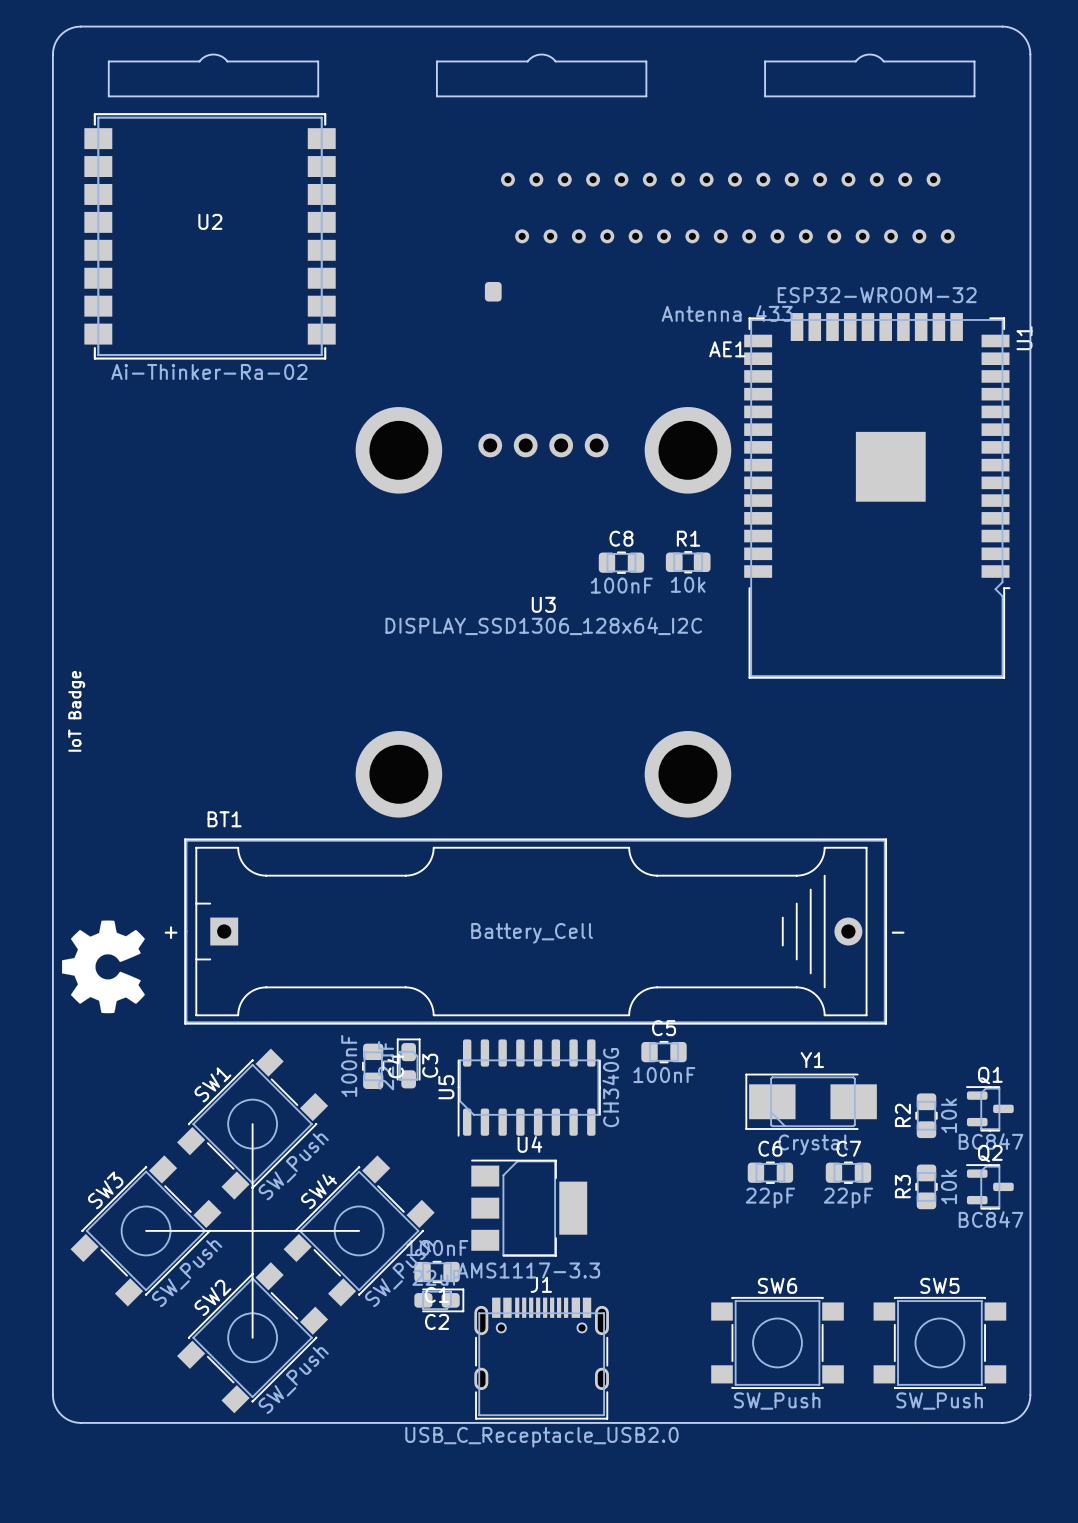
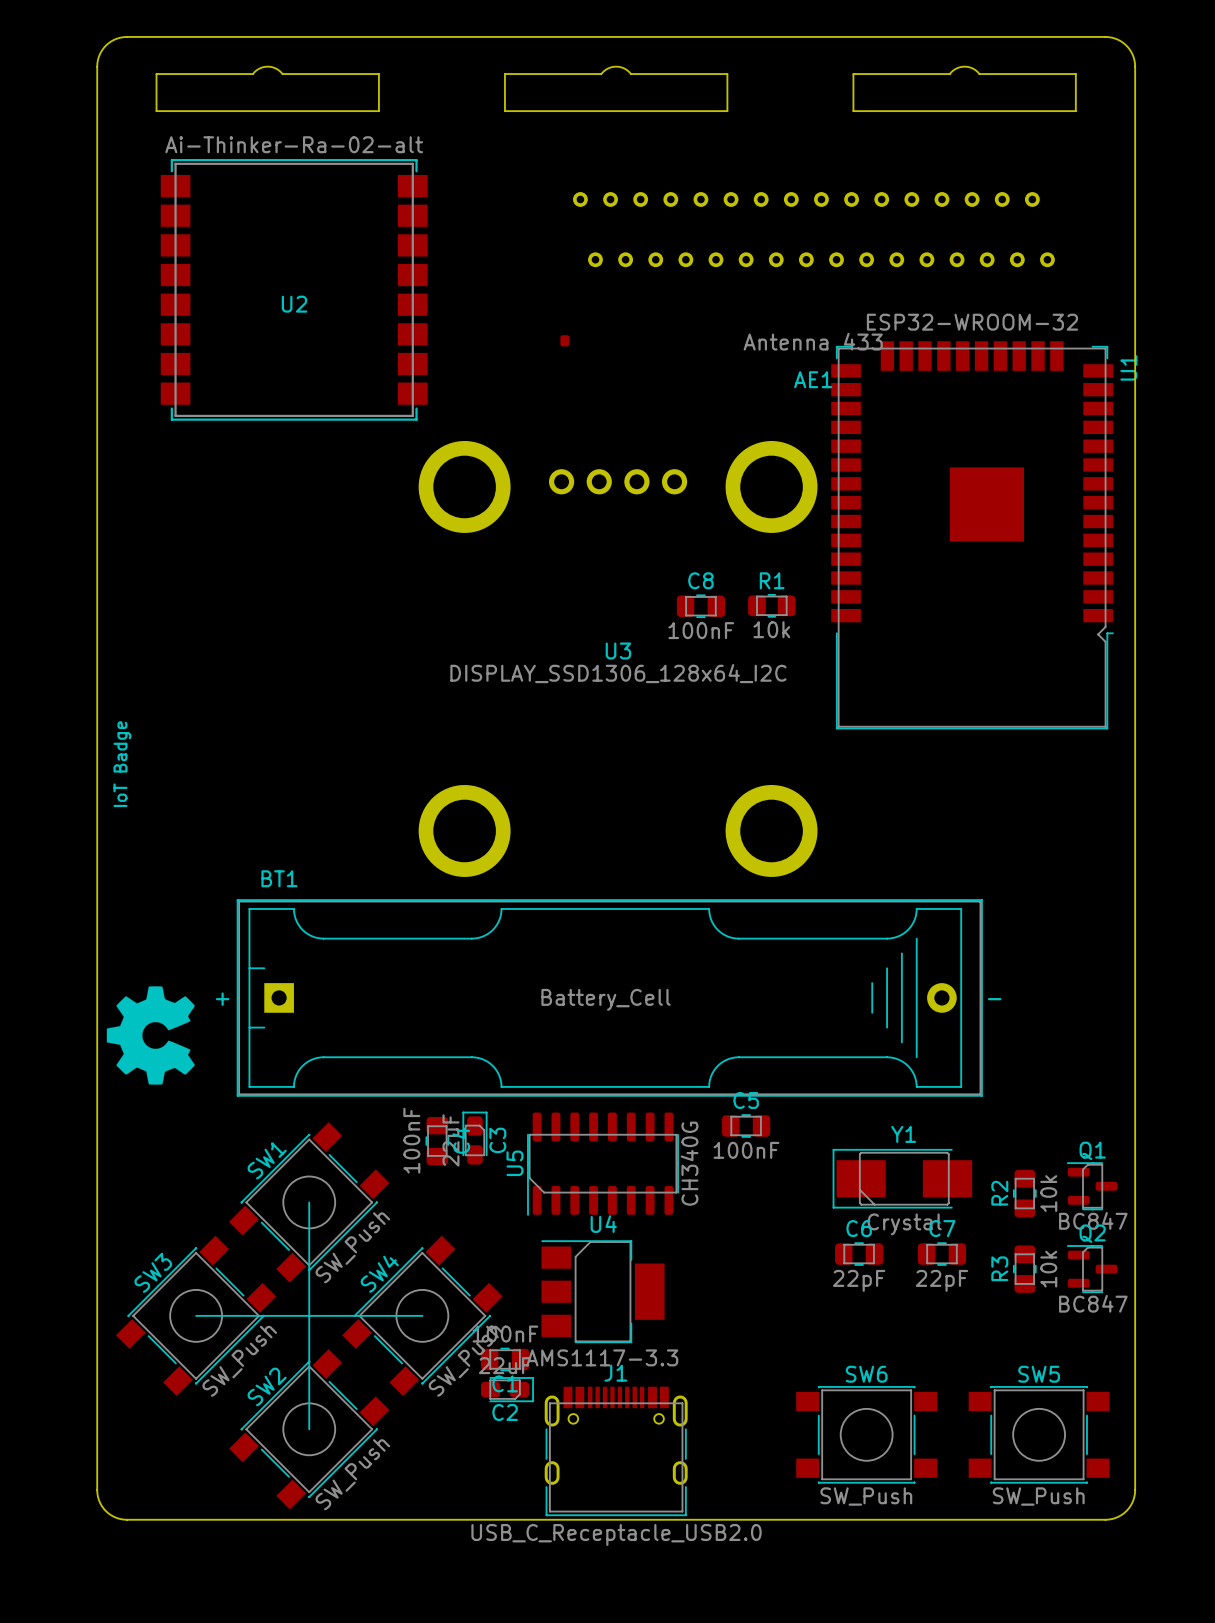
AE1 footprint: [484, 172, 955, 302] -> [560, 192, 1055, 347]
U2 name position: U2 (210, 221) -> U2 (294, 304)
U2 position: (210, 236) -> (294, 289)
U2 value: Ai-Thinker-Ra-02 (209, 371) -> Ai-Thinker-Ra-02-alt (294, 144)

